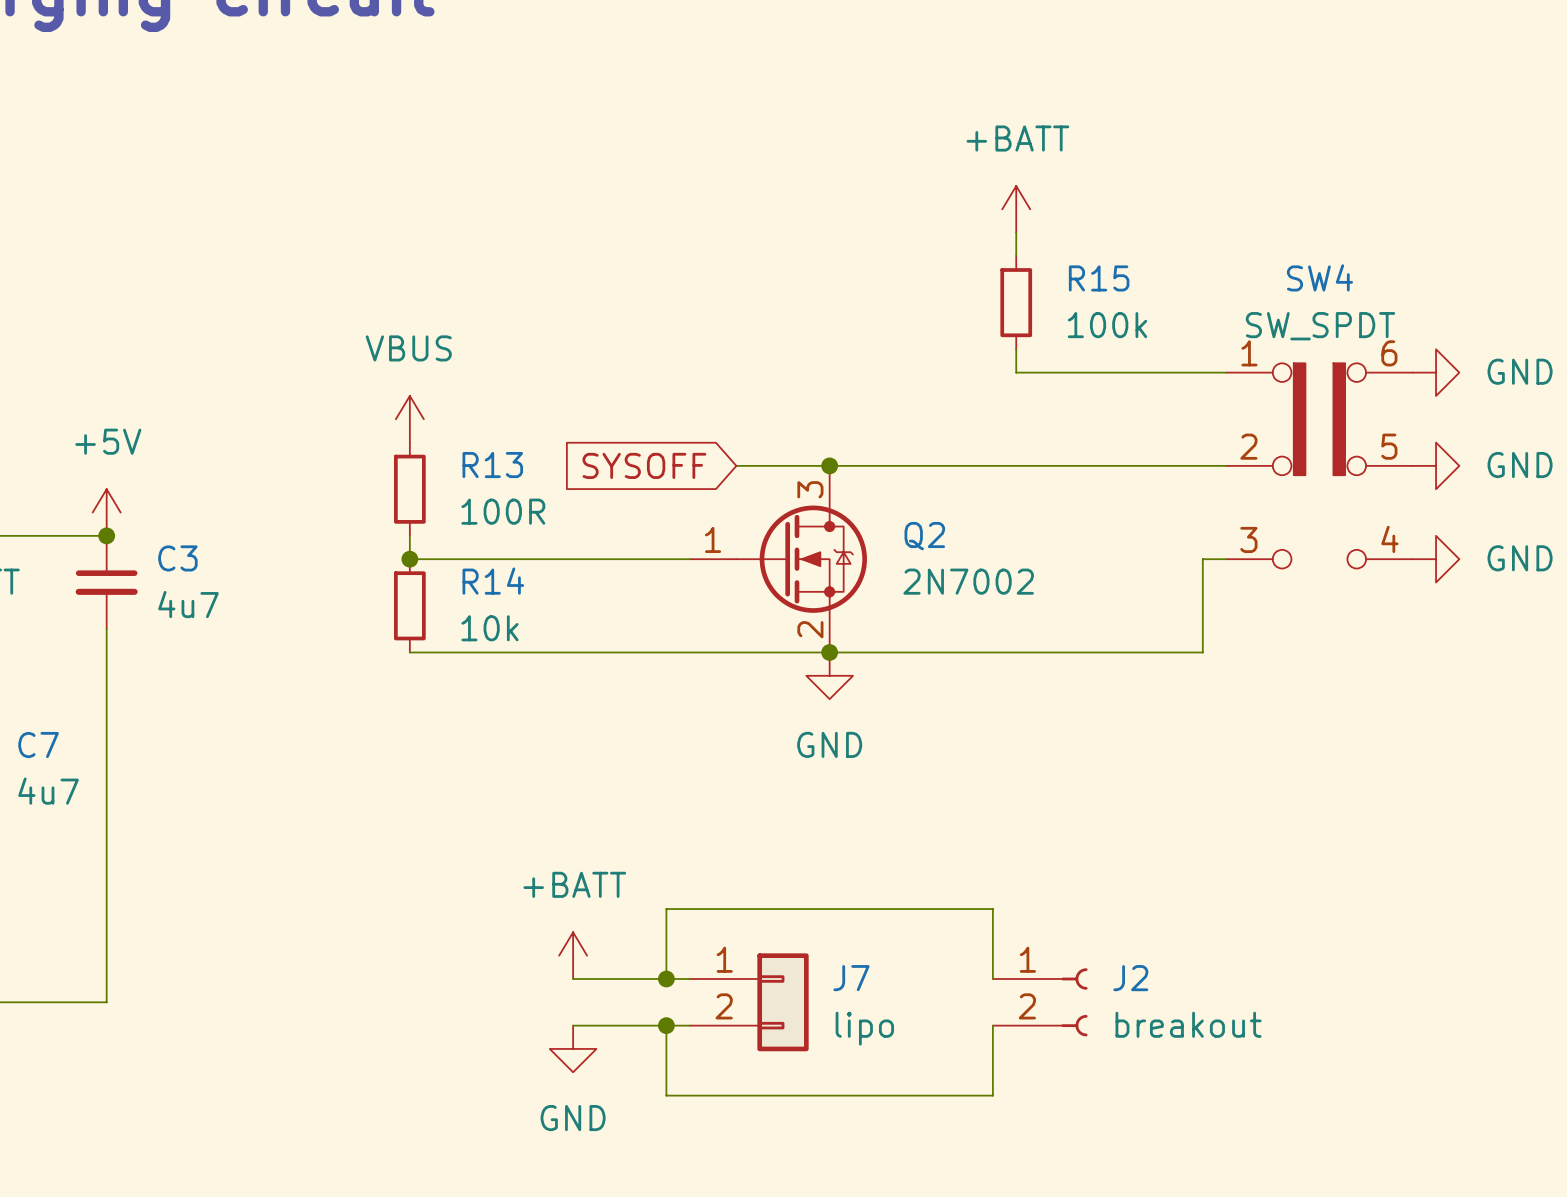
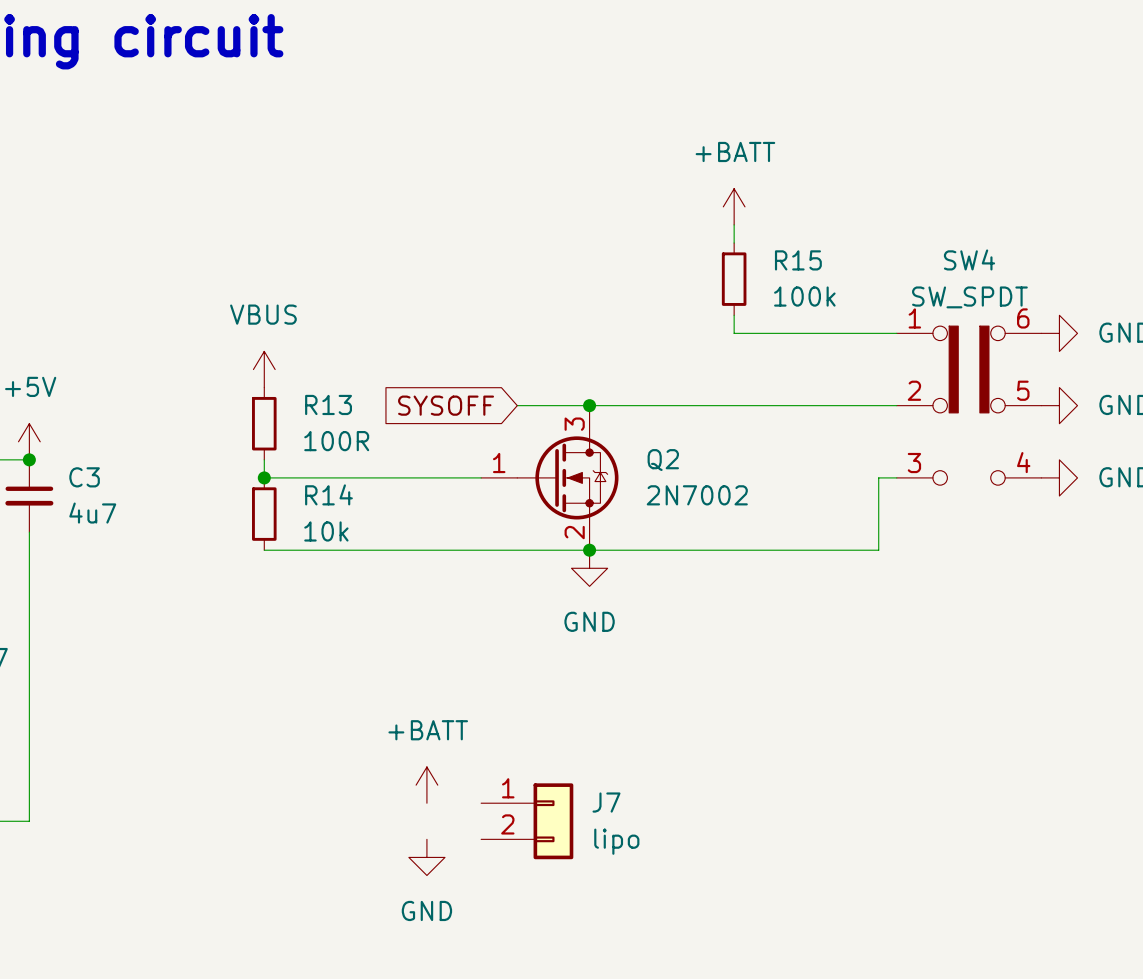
power symbol position: +BATT (573, 955) -> +BATT (426, 785)
wire: (573, 978) (689, 978) -> none
wire: (666, 978) (666, 909) (992, 909) (992, 978) -> none
junction: (666, 978) -> none
J2: breakout (1040, 1002) -> none
wire: (573, 1025) (689, 1025) -> none
wire: (666, 1025) (666, 1095) (992, 1095) (992, 1025) -> none
junction: (666, 1025) -> none
power symbol position: GND (573, 1048) -> GND (426, 857)

